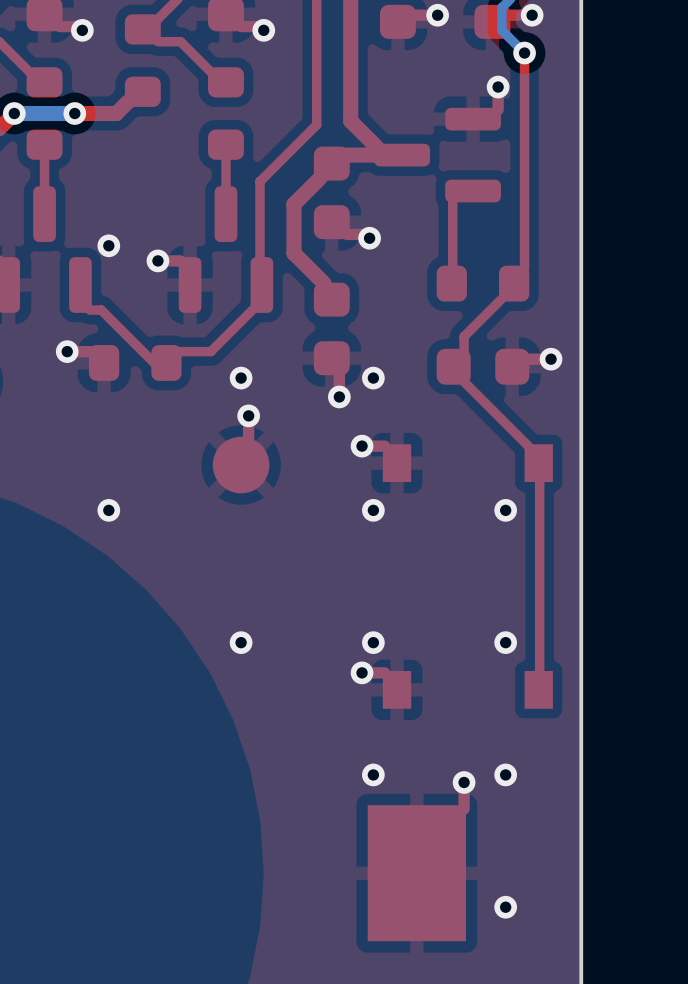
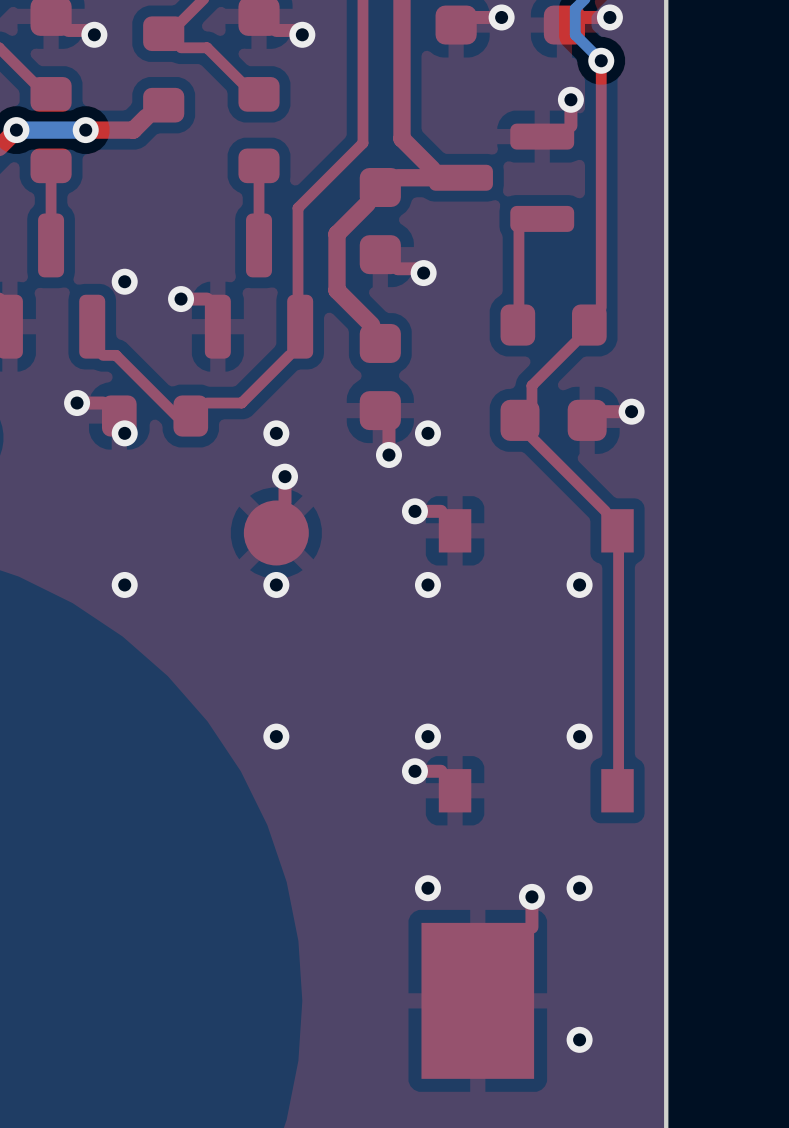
via: none -> (124, 433)
via: none -> (276, 584)

